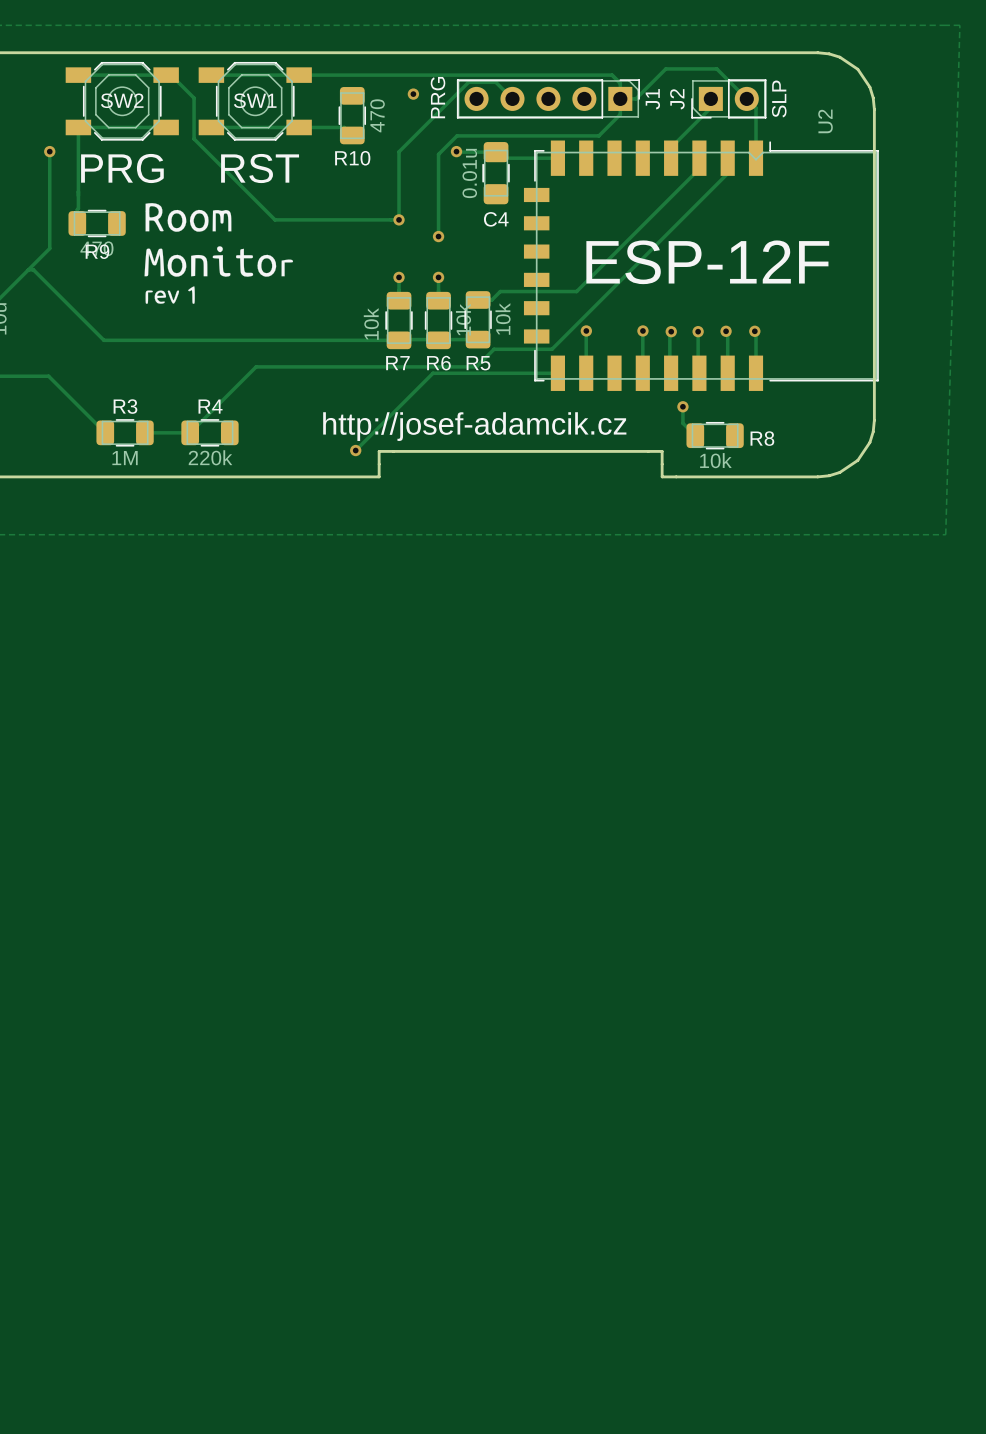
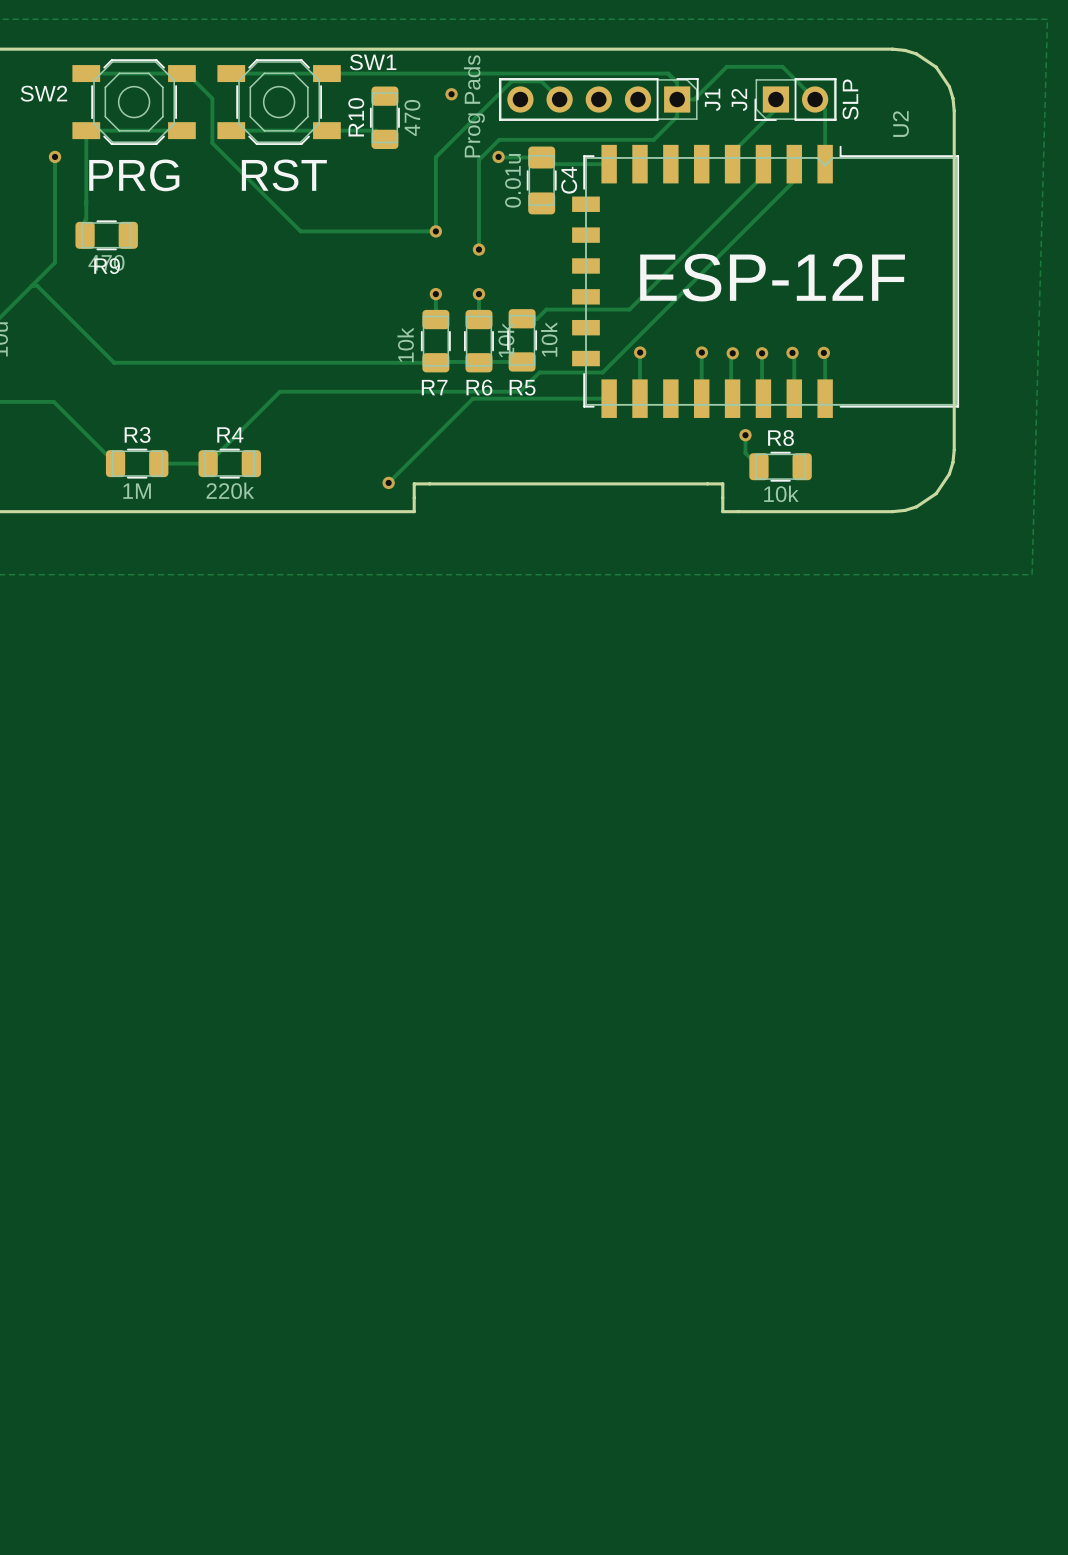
J1 value: PRG (438, 97) -> Prog Pads (474, 106)
SW2 name position: SW2 (122, 100) -> SW2 (43, 93)
SW1 name position: SW1 (255, 100) -> SW1 (373, 62)
R10 name rotation: 0° (352, 158) -> 90° counterclockwise (356, 117)
R10 name position: R10 (352, 158) -> R10 (356, 117)
drawing: [144, 203, 294, 304] -> none
C4 name rotation: 0° (496, 219) -> 90° counterclockwise (569, 180)
C4 name position: C4 (496, 219) -> C4 (569, 180)
text: http://josef-adamcik.cz (474, 426) -> none
R8 name position: R8 (762, 438) -> R8 (780, 438)

